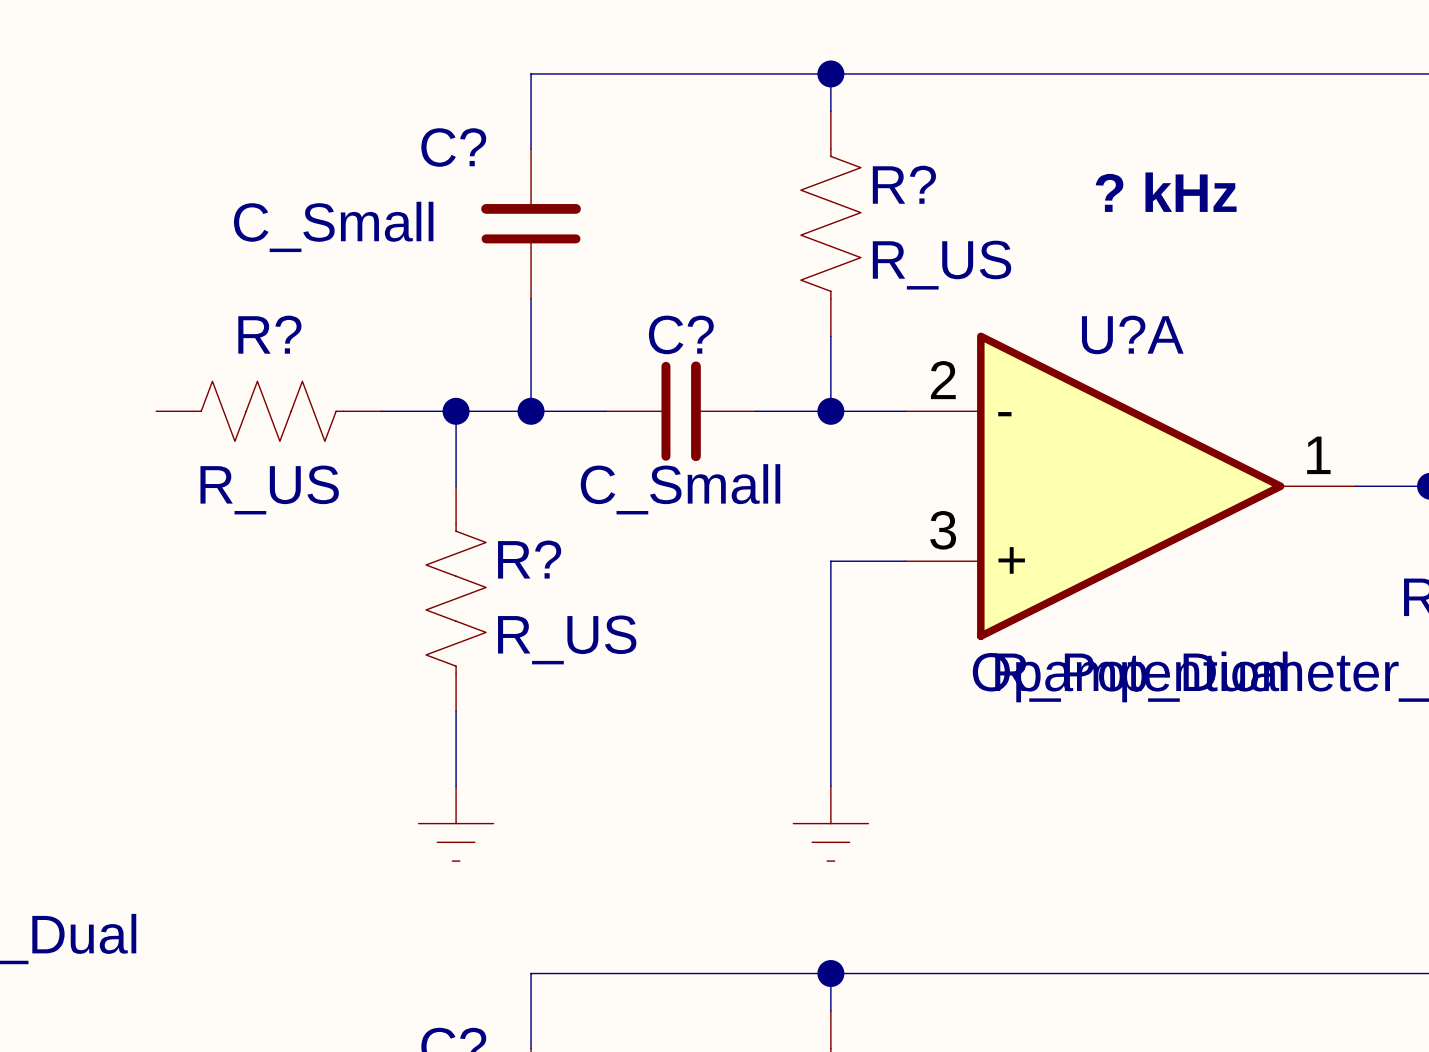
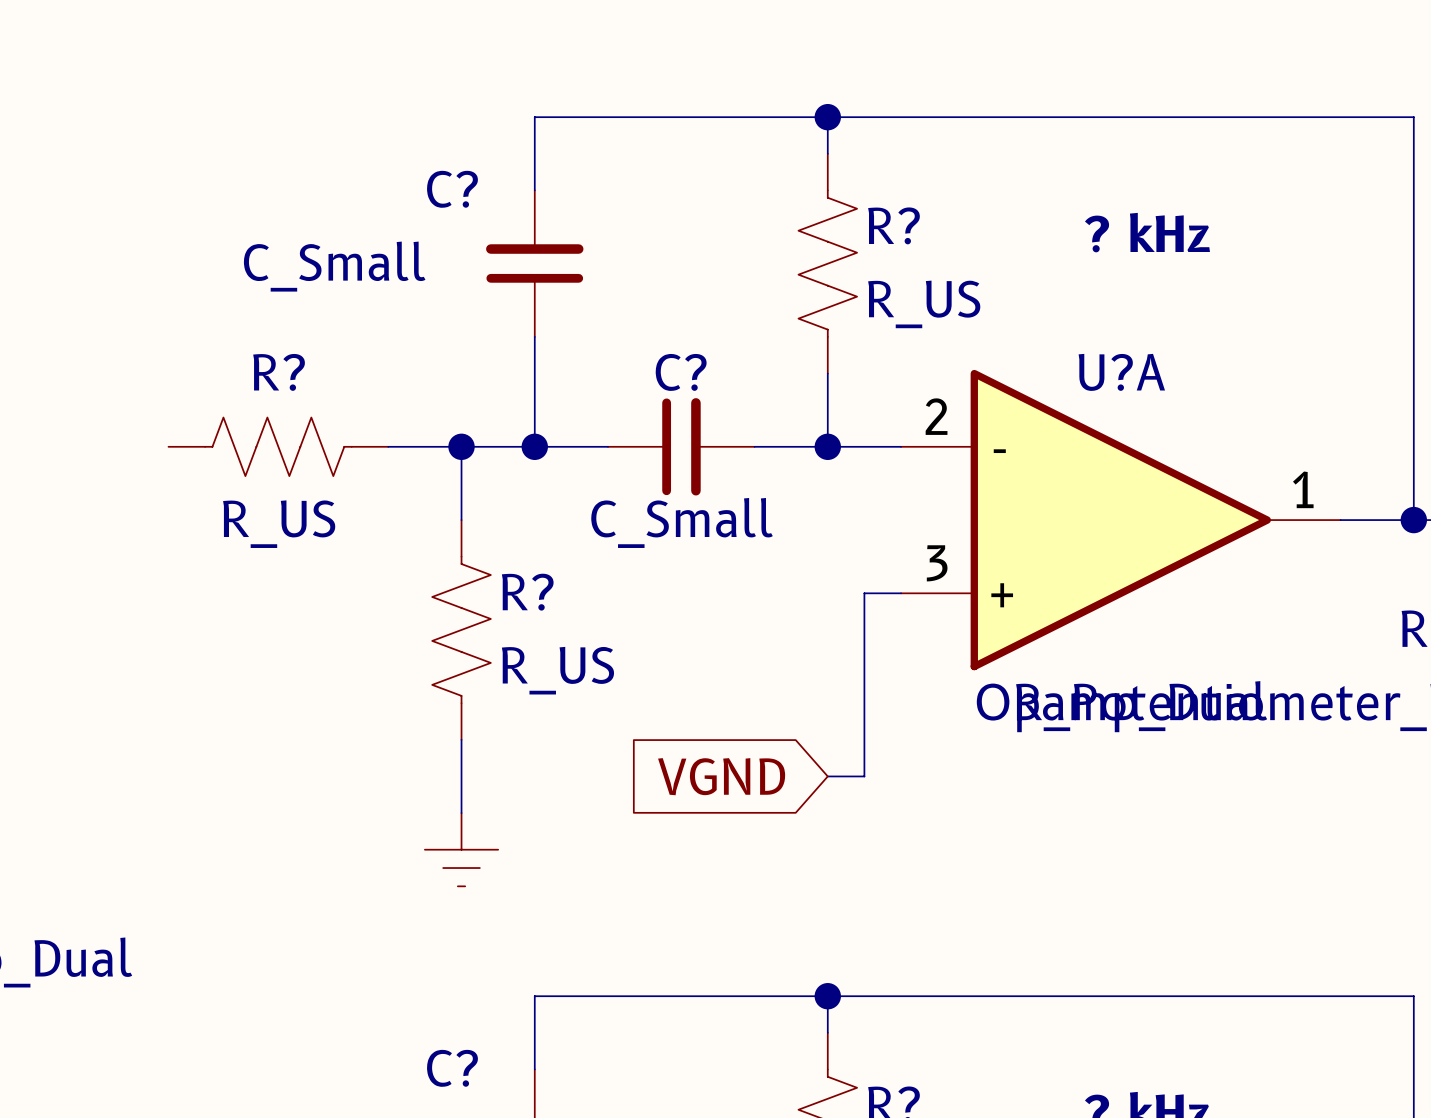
wire: (868, 561) (830, 561) (830, 786) -> (864, 593) (864, 776) (827, 776)
global label: none -> VGND (721, 776)
power symbol: (830, 823) -> none

